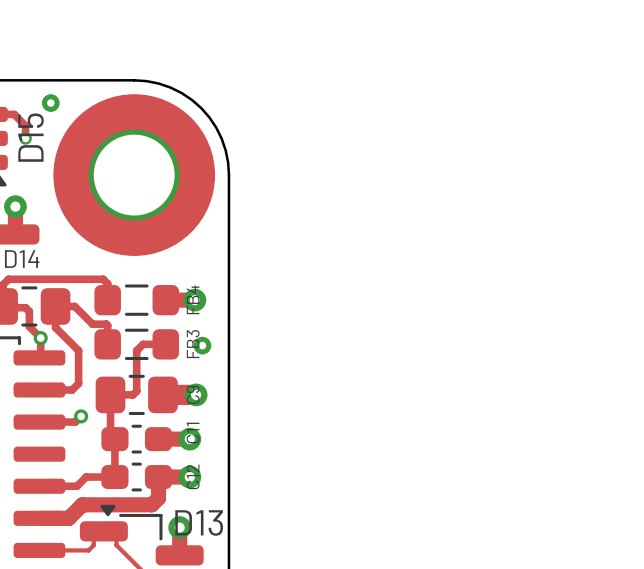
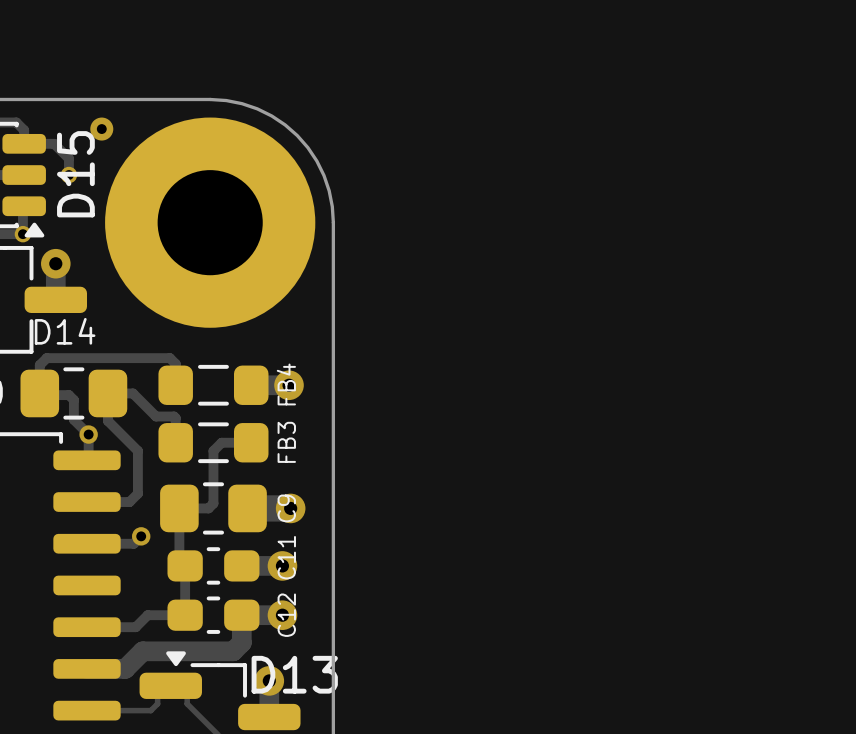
via: (202, 345) -> none

